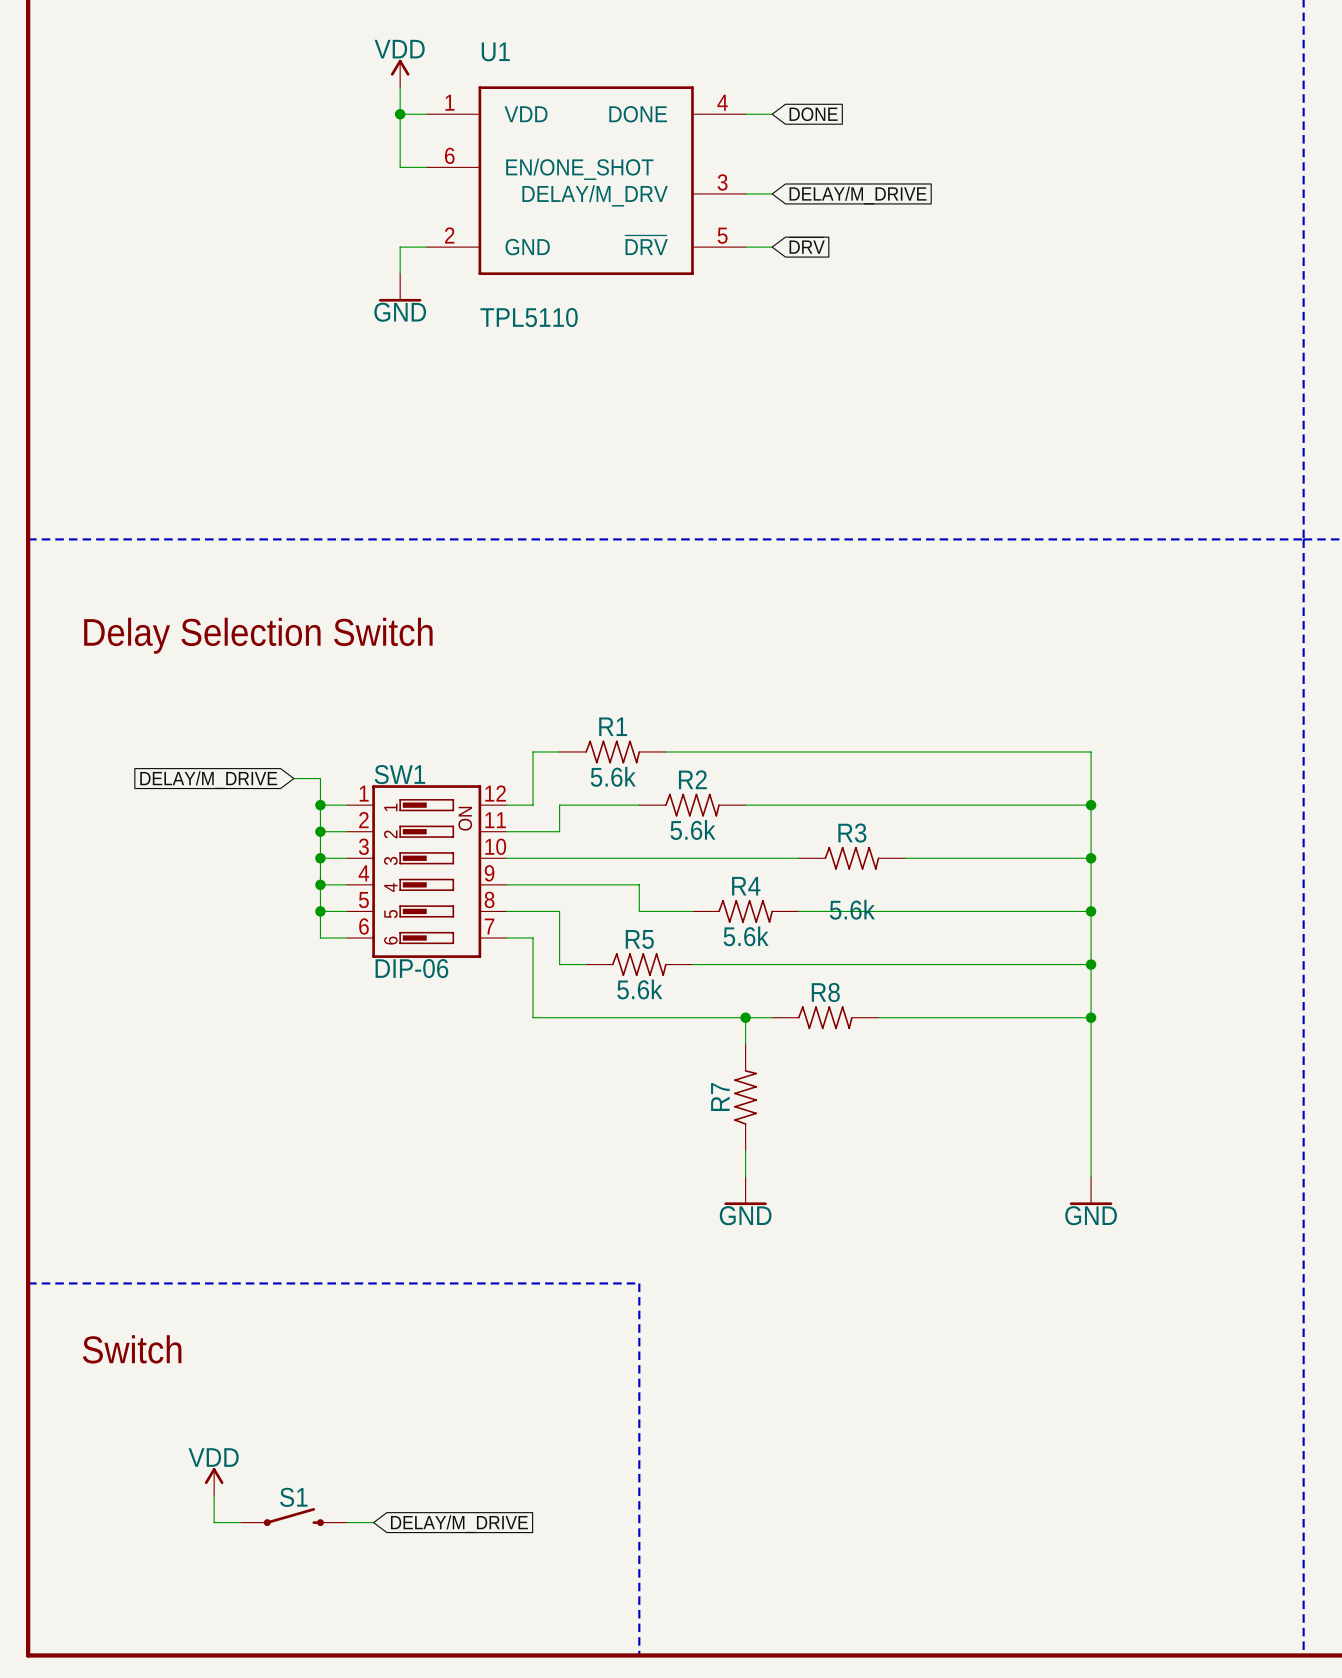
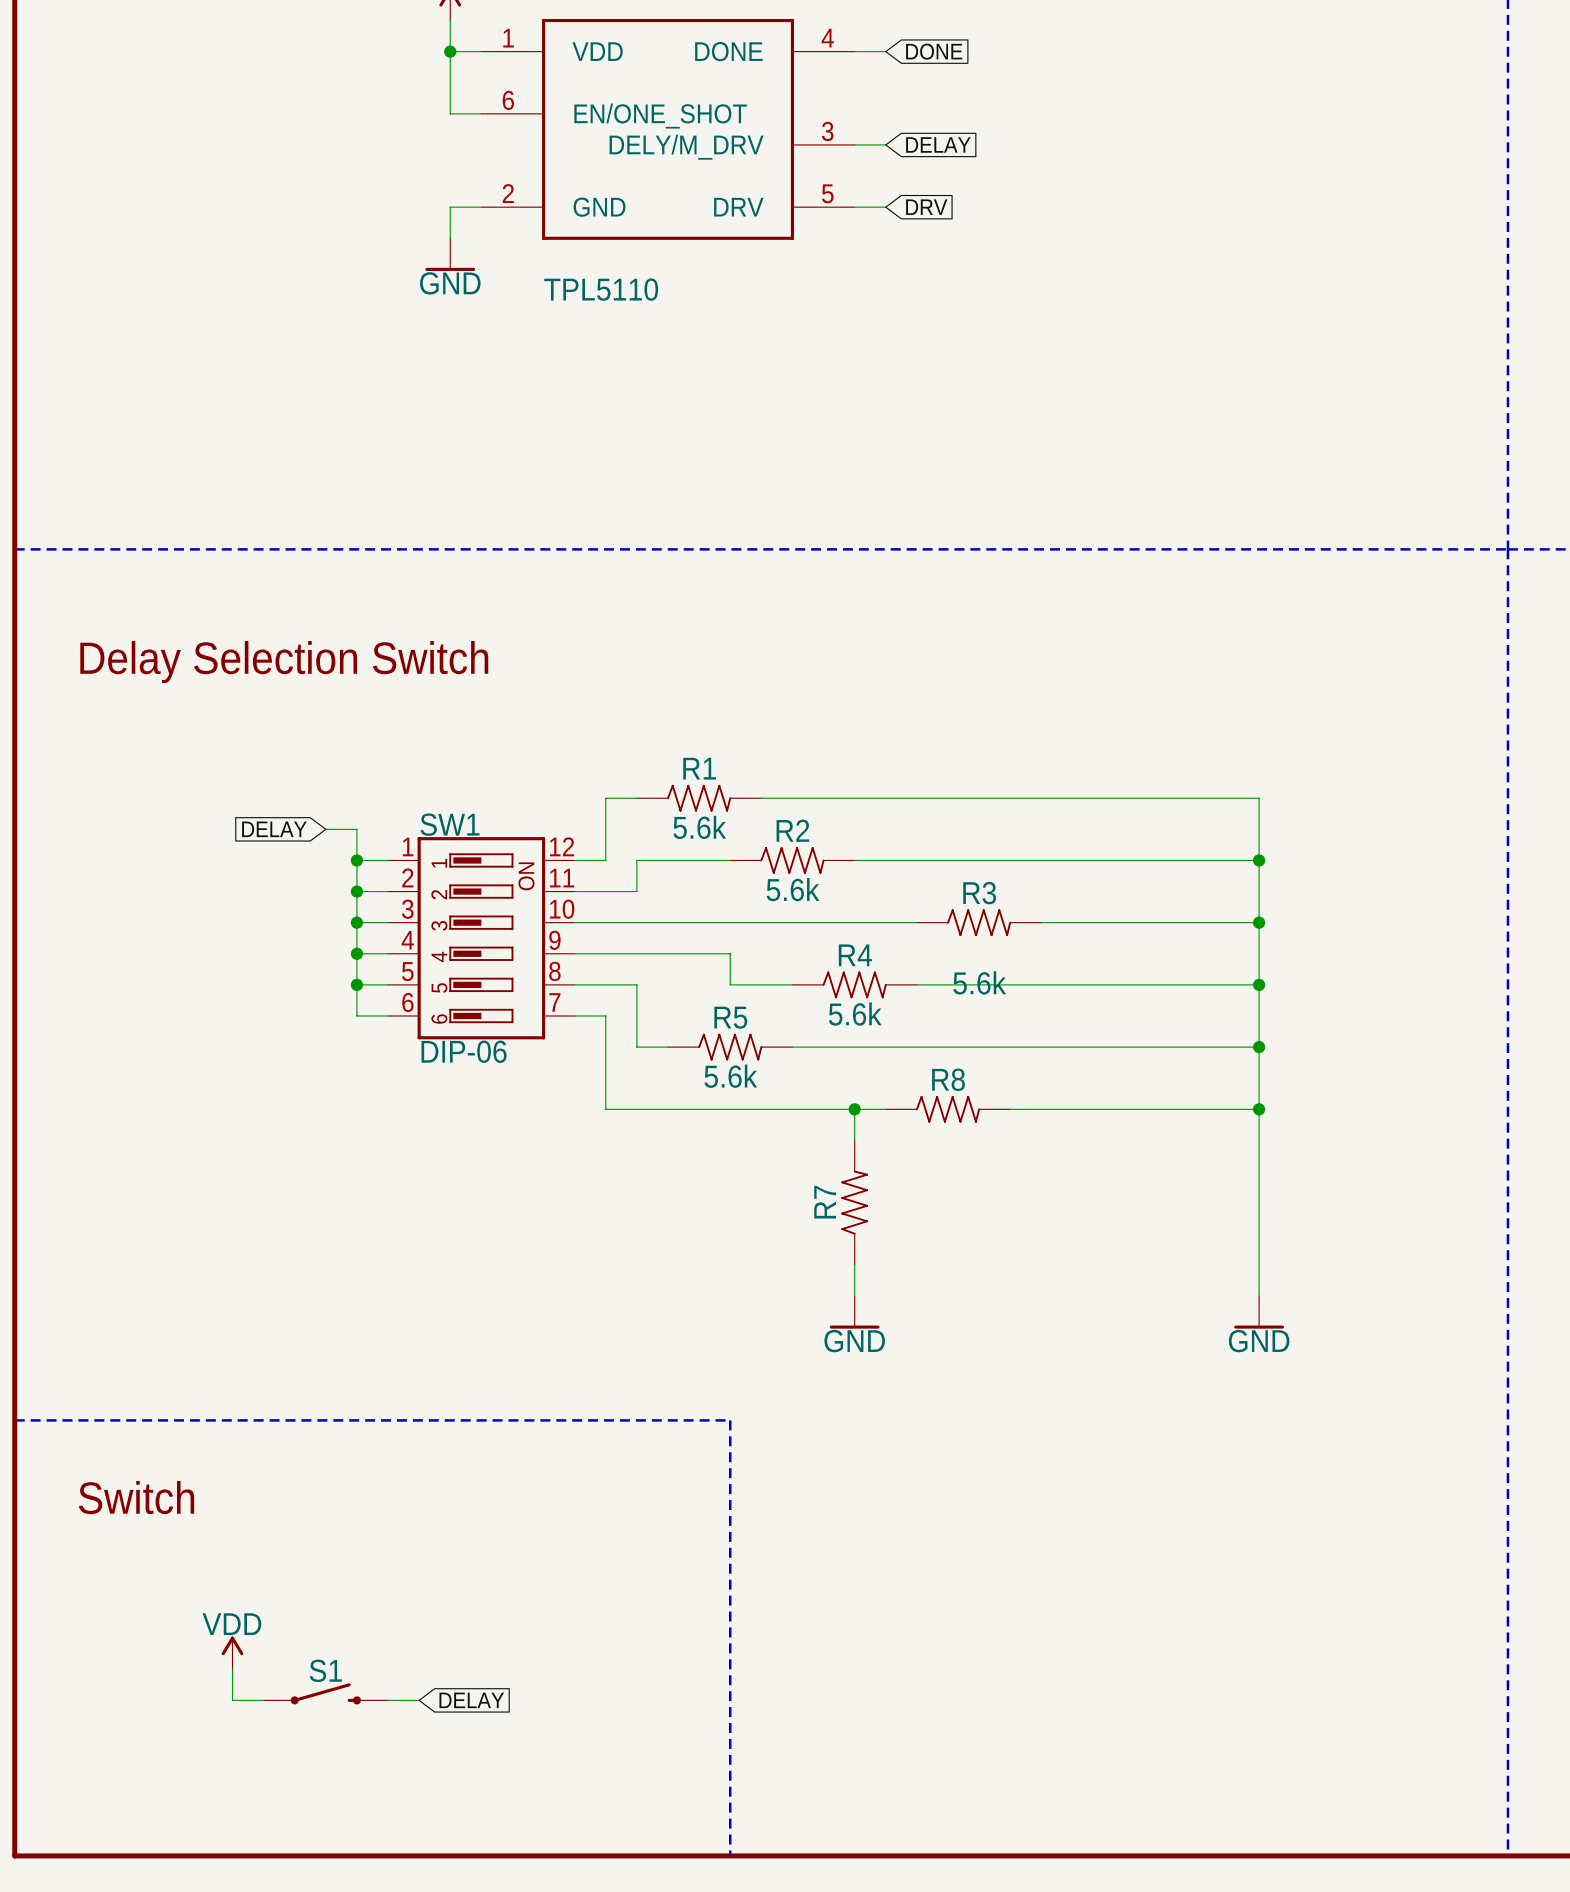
U1 pin name: DELAY/M_DRV (595, 195) -> DELY/M_DRV (686, 147)
global label: DELAY/M_DRIVE (858, 195) -> DELAY (938, 144)
U1 pin name: ~{DRV} (646, 245) -> DRV (738, 207)
global label: ~{DRV} (807, 245) -> DRV (926, 207)
global label: DELAY/M_DRIVE (208, 780) -> DELAY (274, 829)
global label: DELAY/M_DRIVE (459, 1524) -> DELAY (471, 1700)

